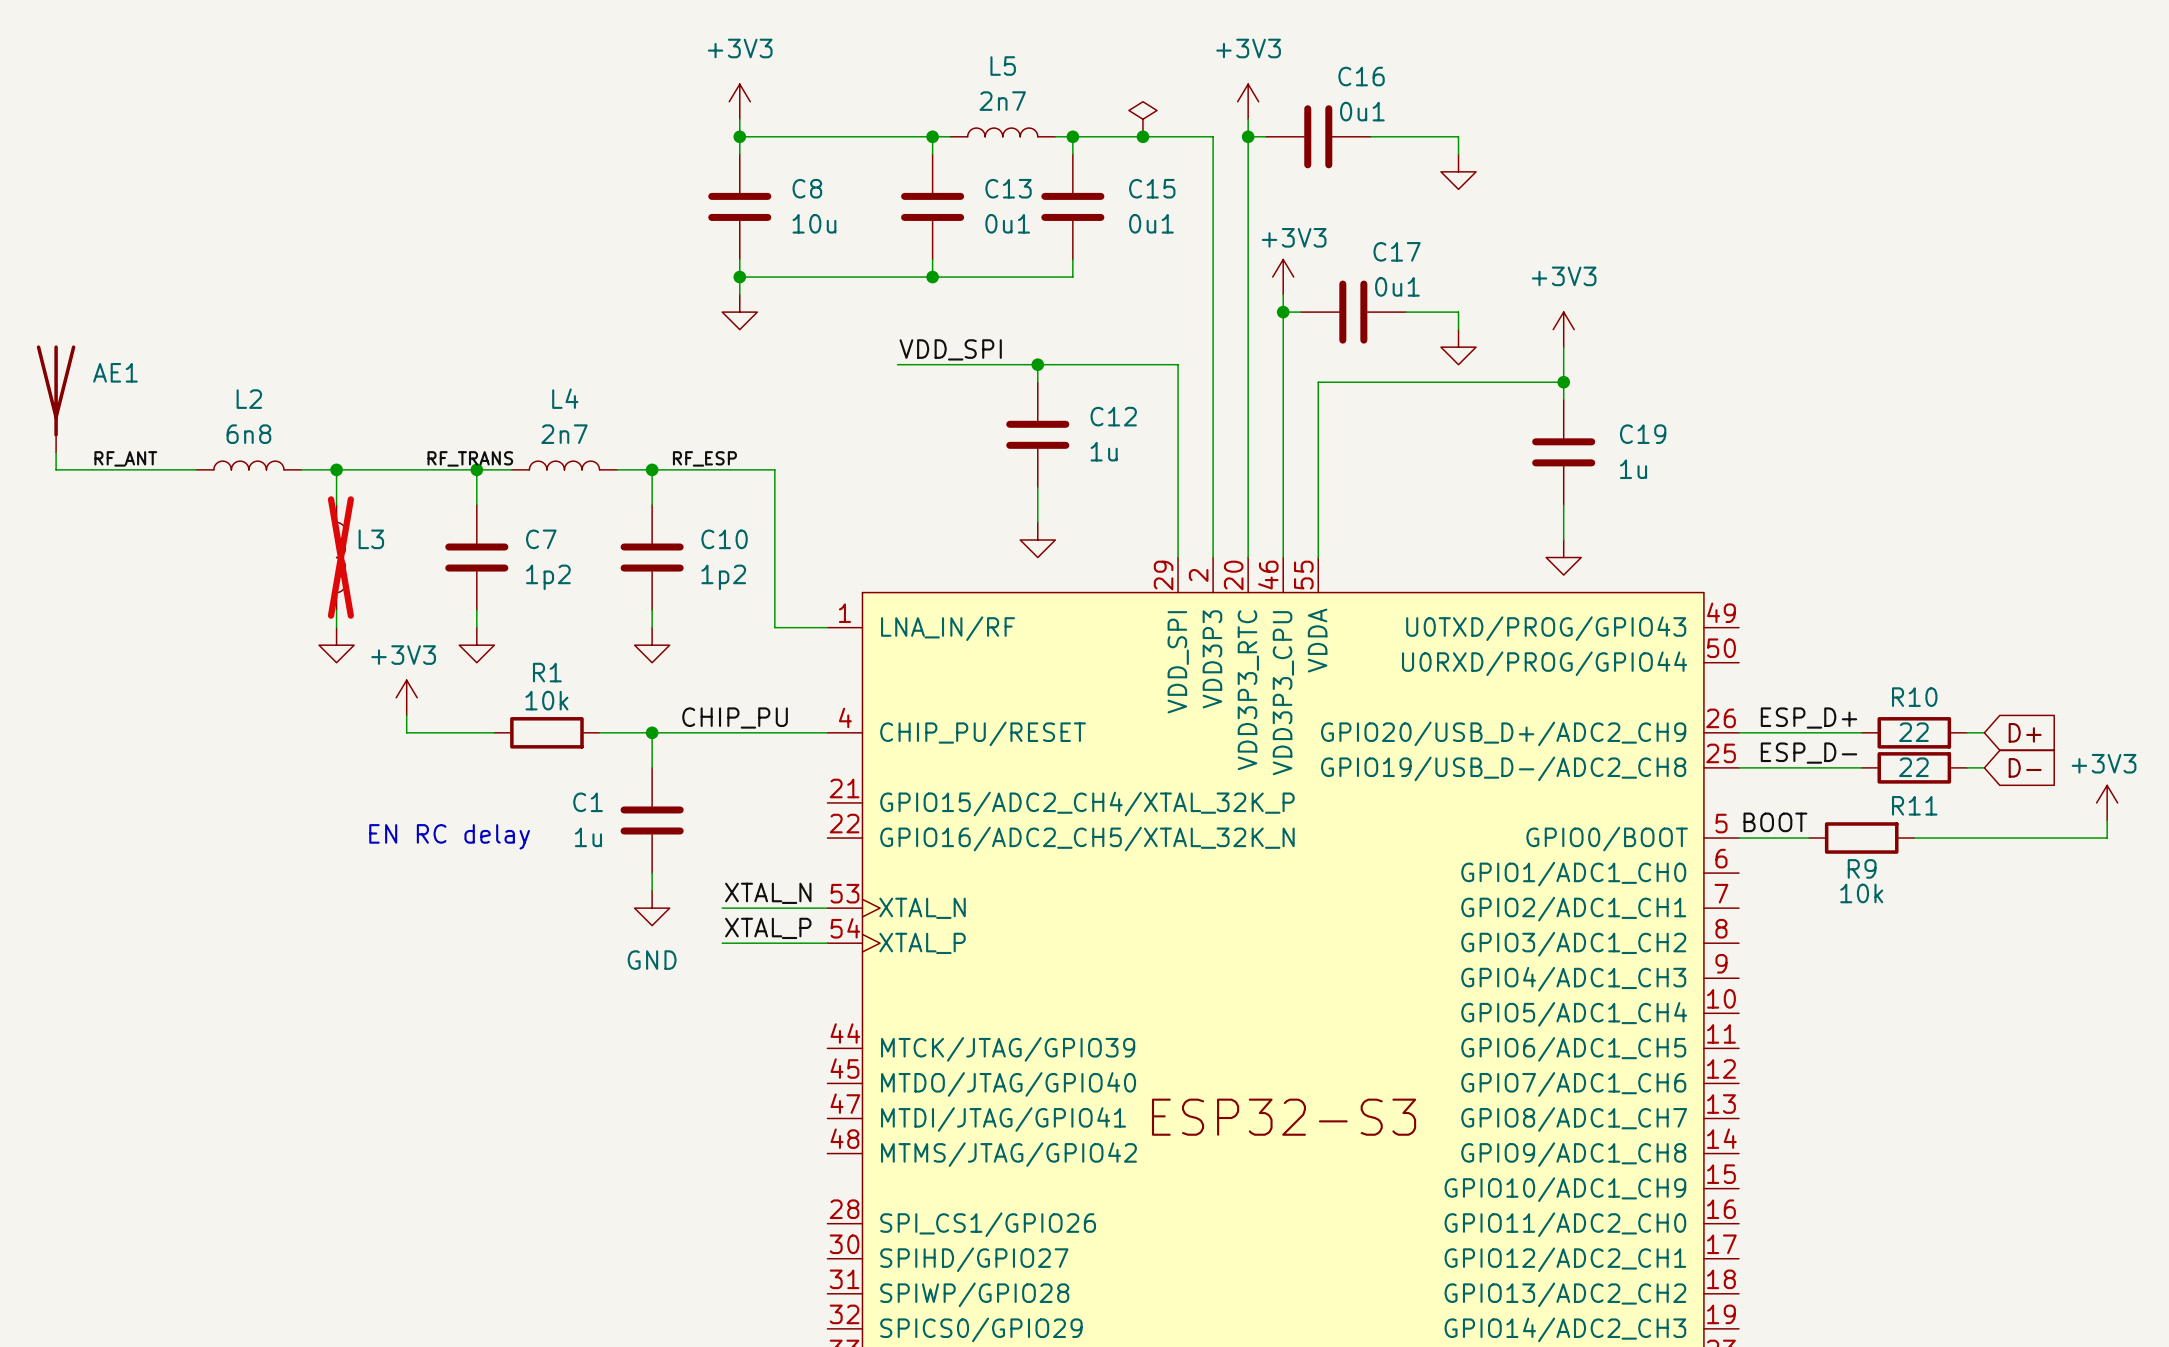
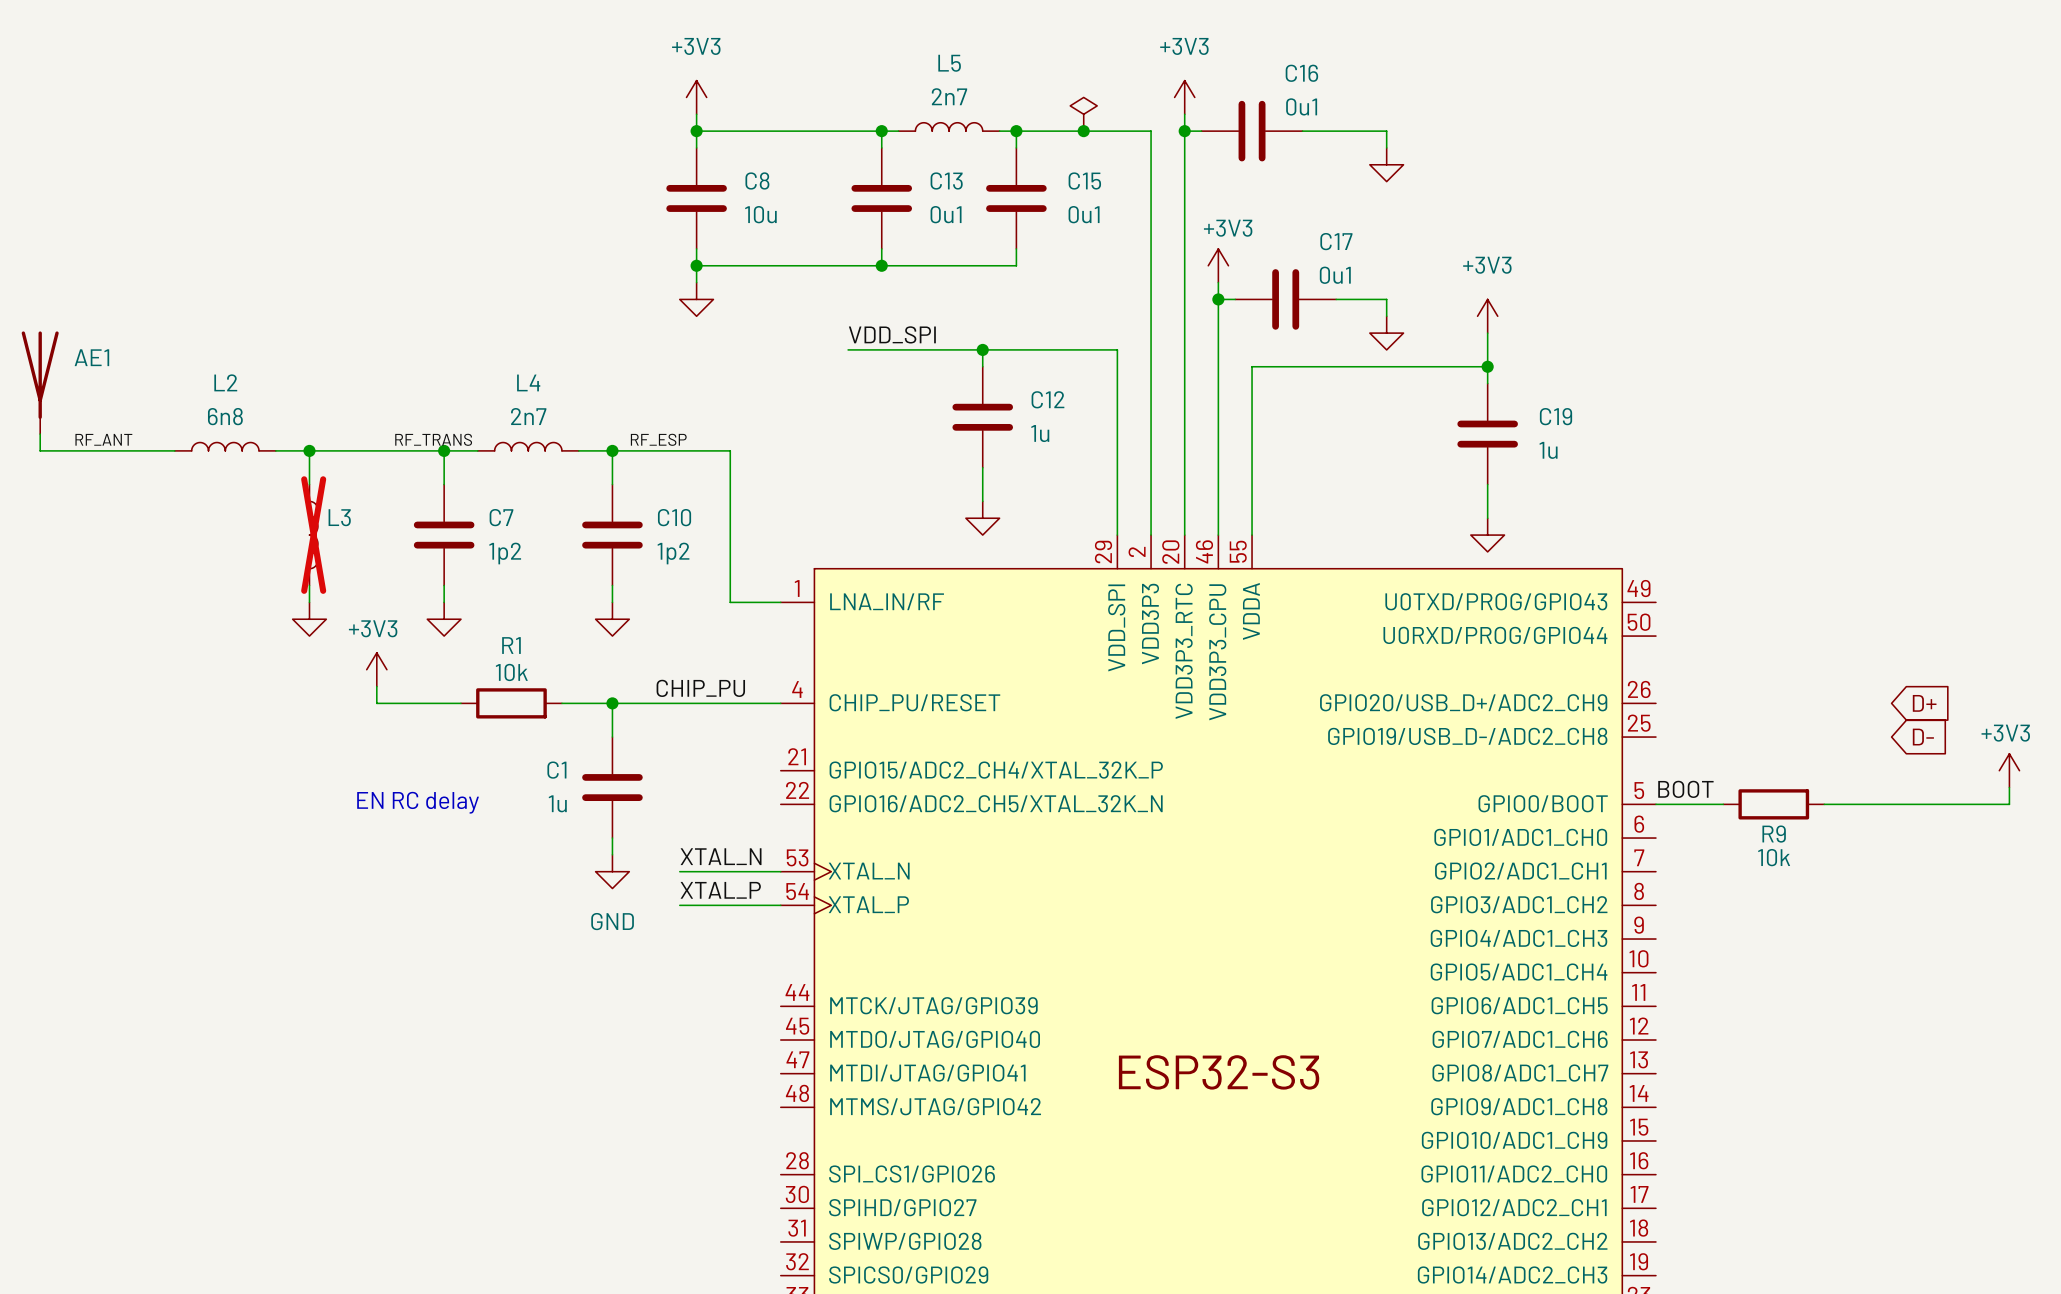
label: ESP_D+ (1808, 718) -> none
wire: (1739, 732) (1861, 732) -> none
R10: 22 (1914, 732) -> none
wire: (1966, 732) (1984, 732) -> none
label: ESP_D- (1808, 753) -> none
wire: (1739, 767) (1861, 767) -> none
R11: 22 (1914, 767) -> none
wire: (1966, 767) (1984, 767) -> none

